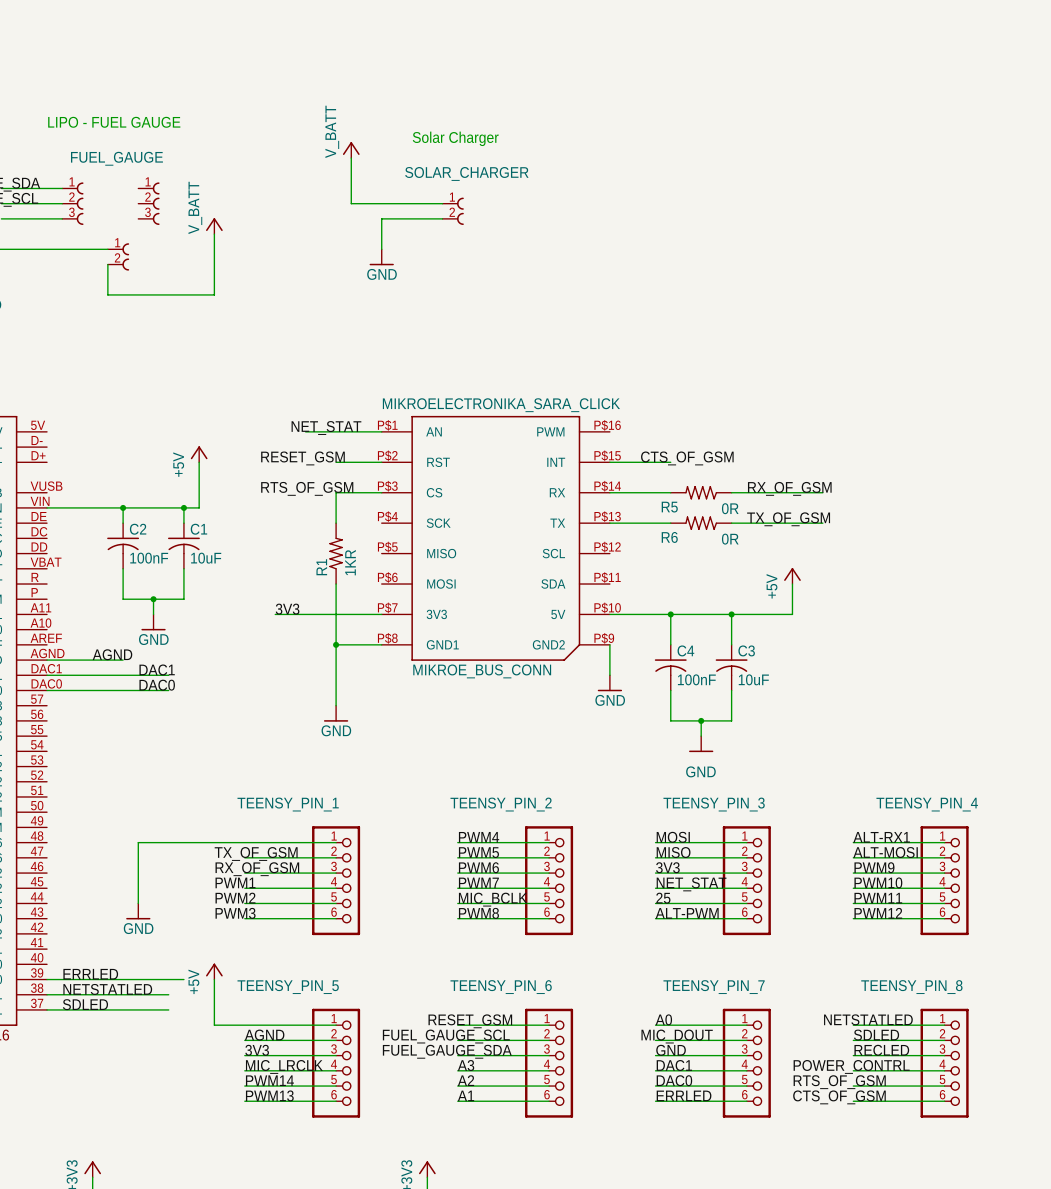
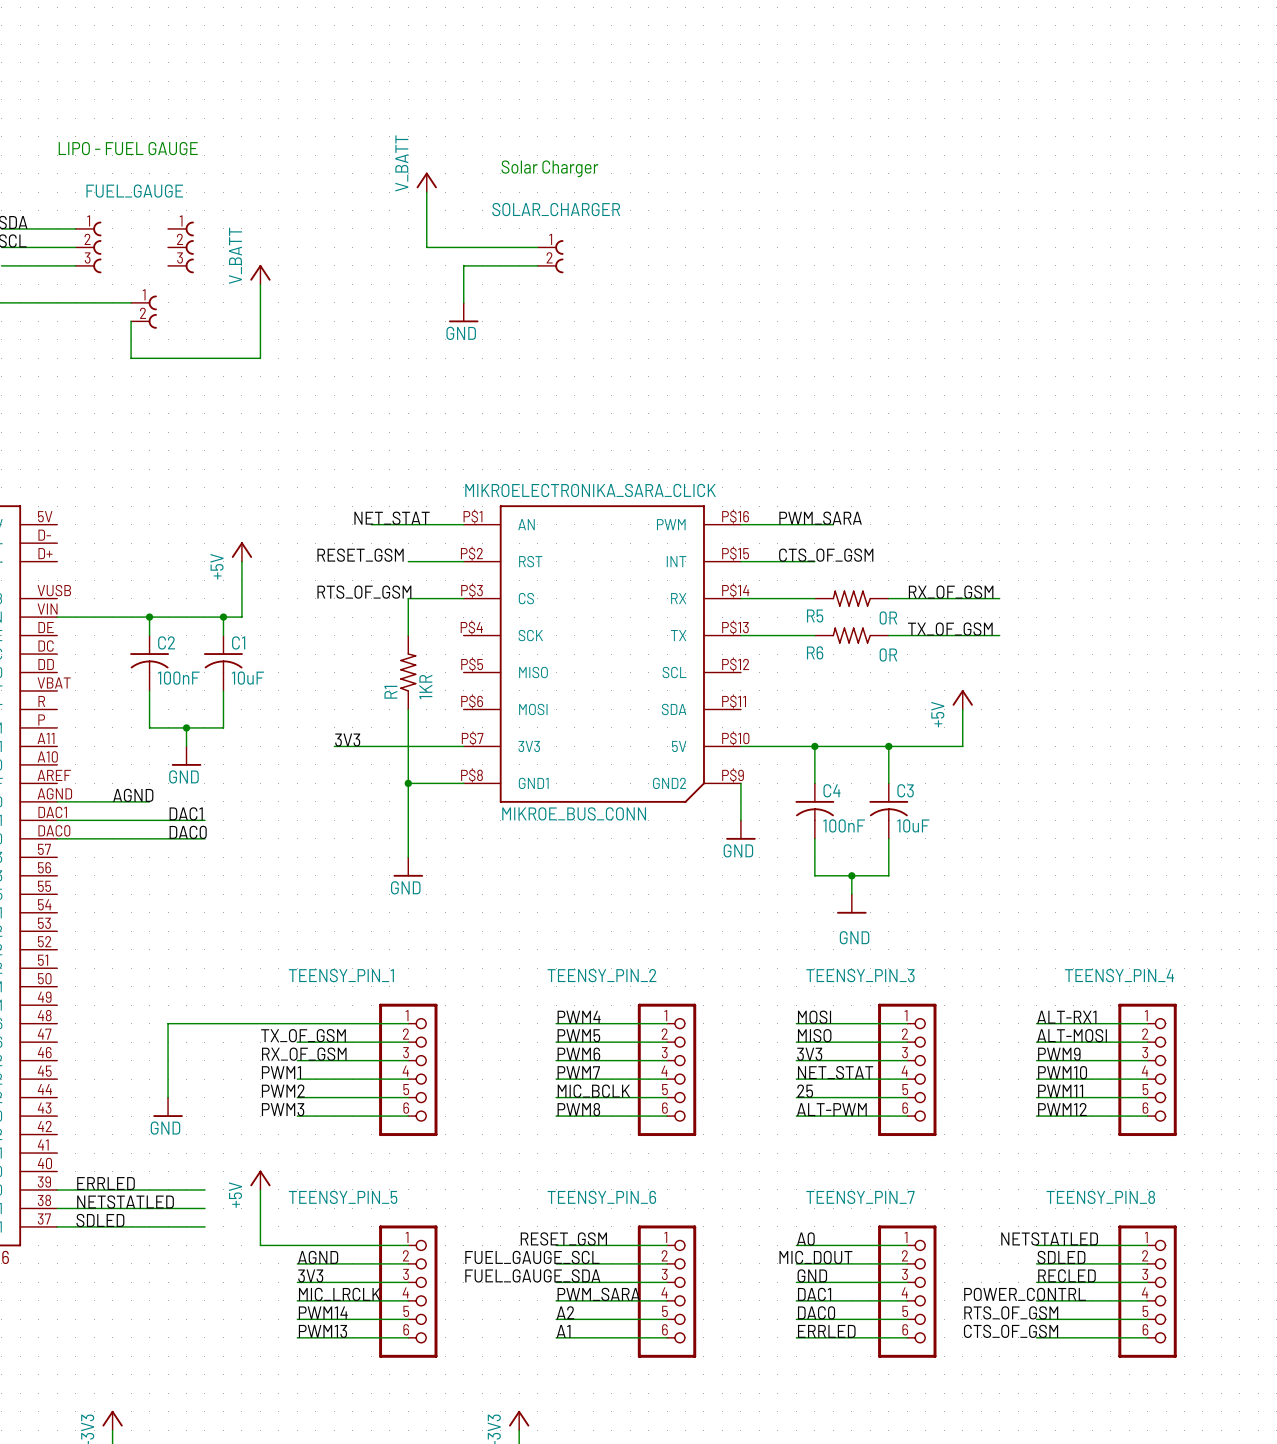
label: none -> PWM_SARA (820, 518)
wire: none -> (740, 524) (833, 524)
wire: (168, 979) (183, 979) -> none
label: A3 (466, 1065) -> PWM_SARA (598, 1294)

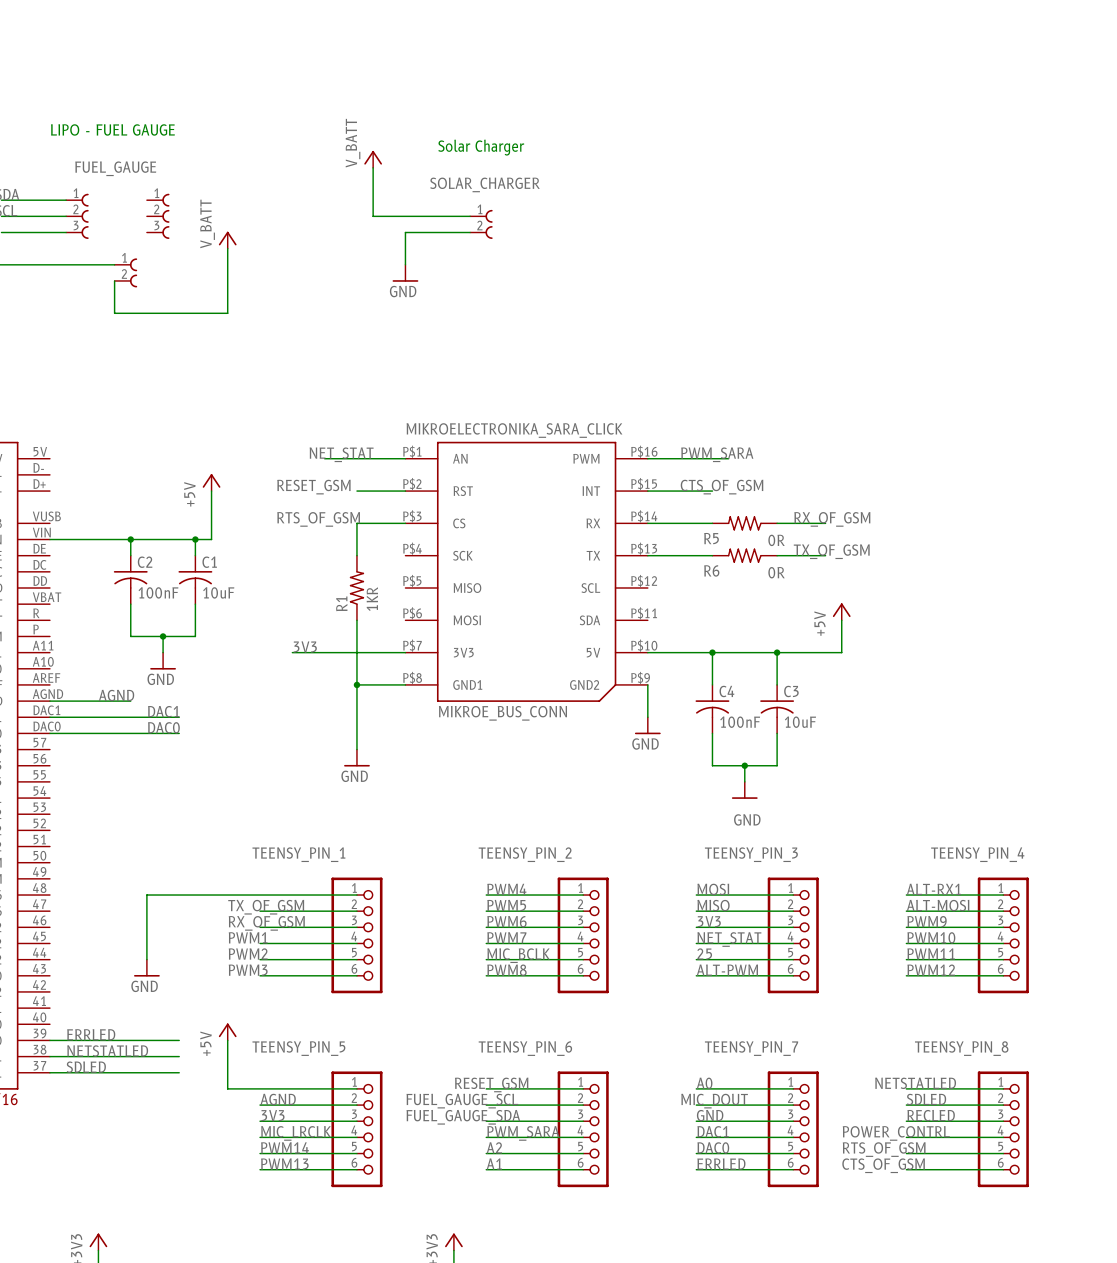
wire: (944, 598) (999, 598) -> none
wire: (944, 635) (999, 635) -> none

